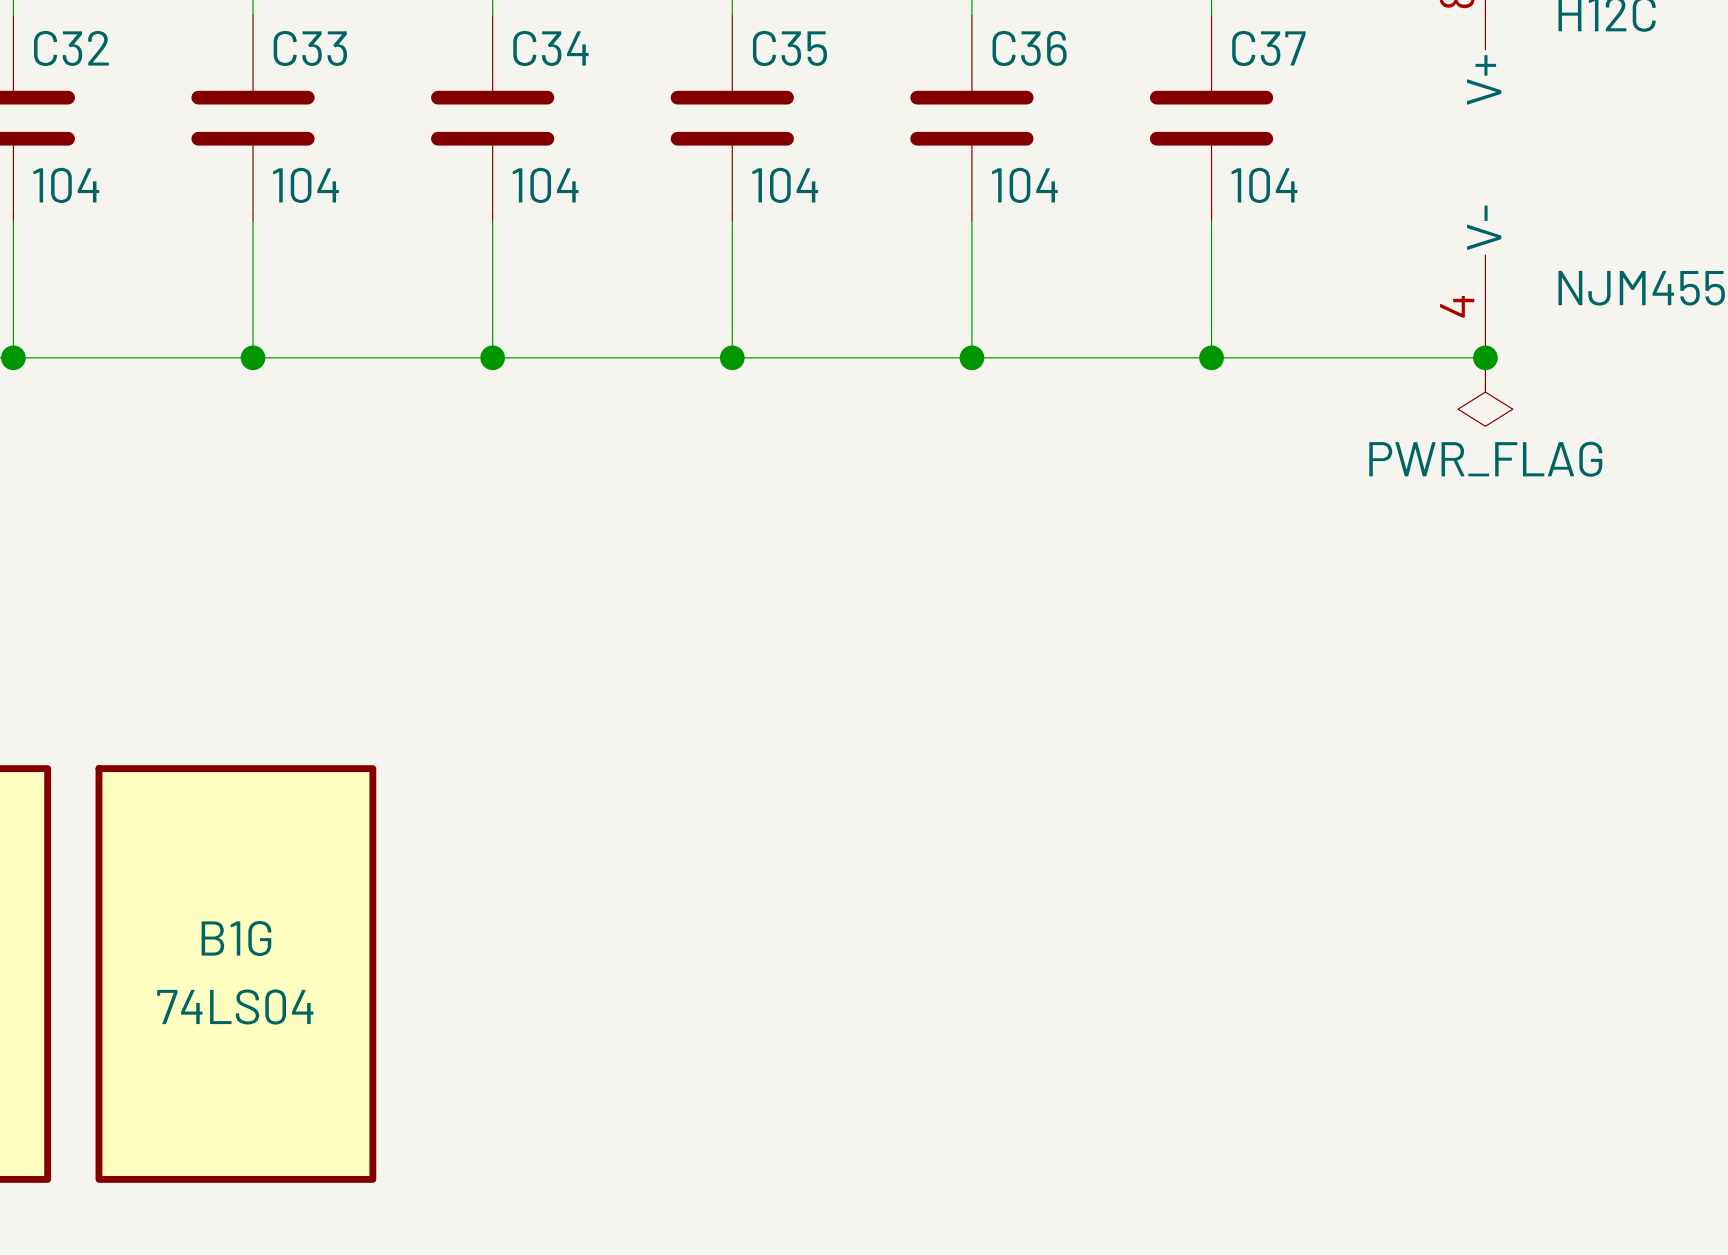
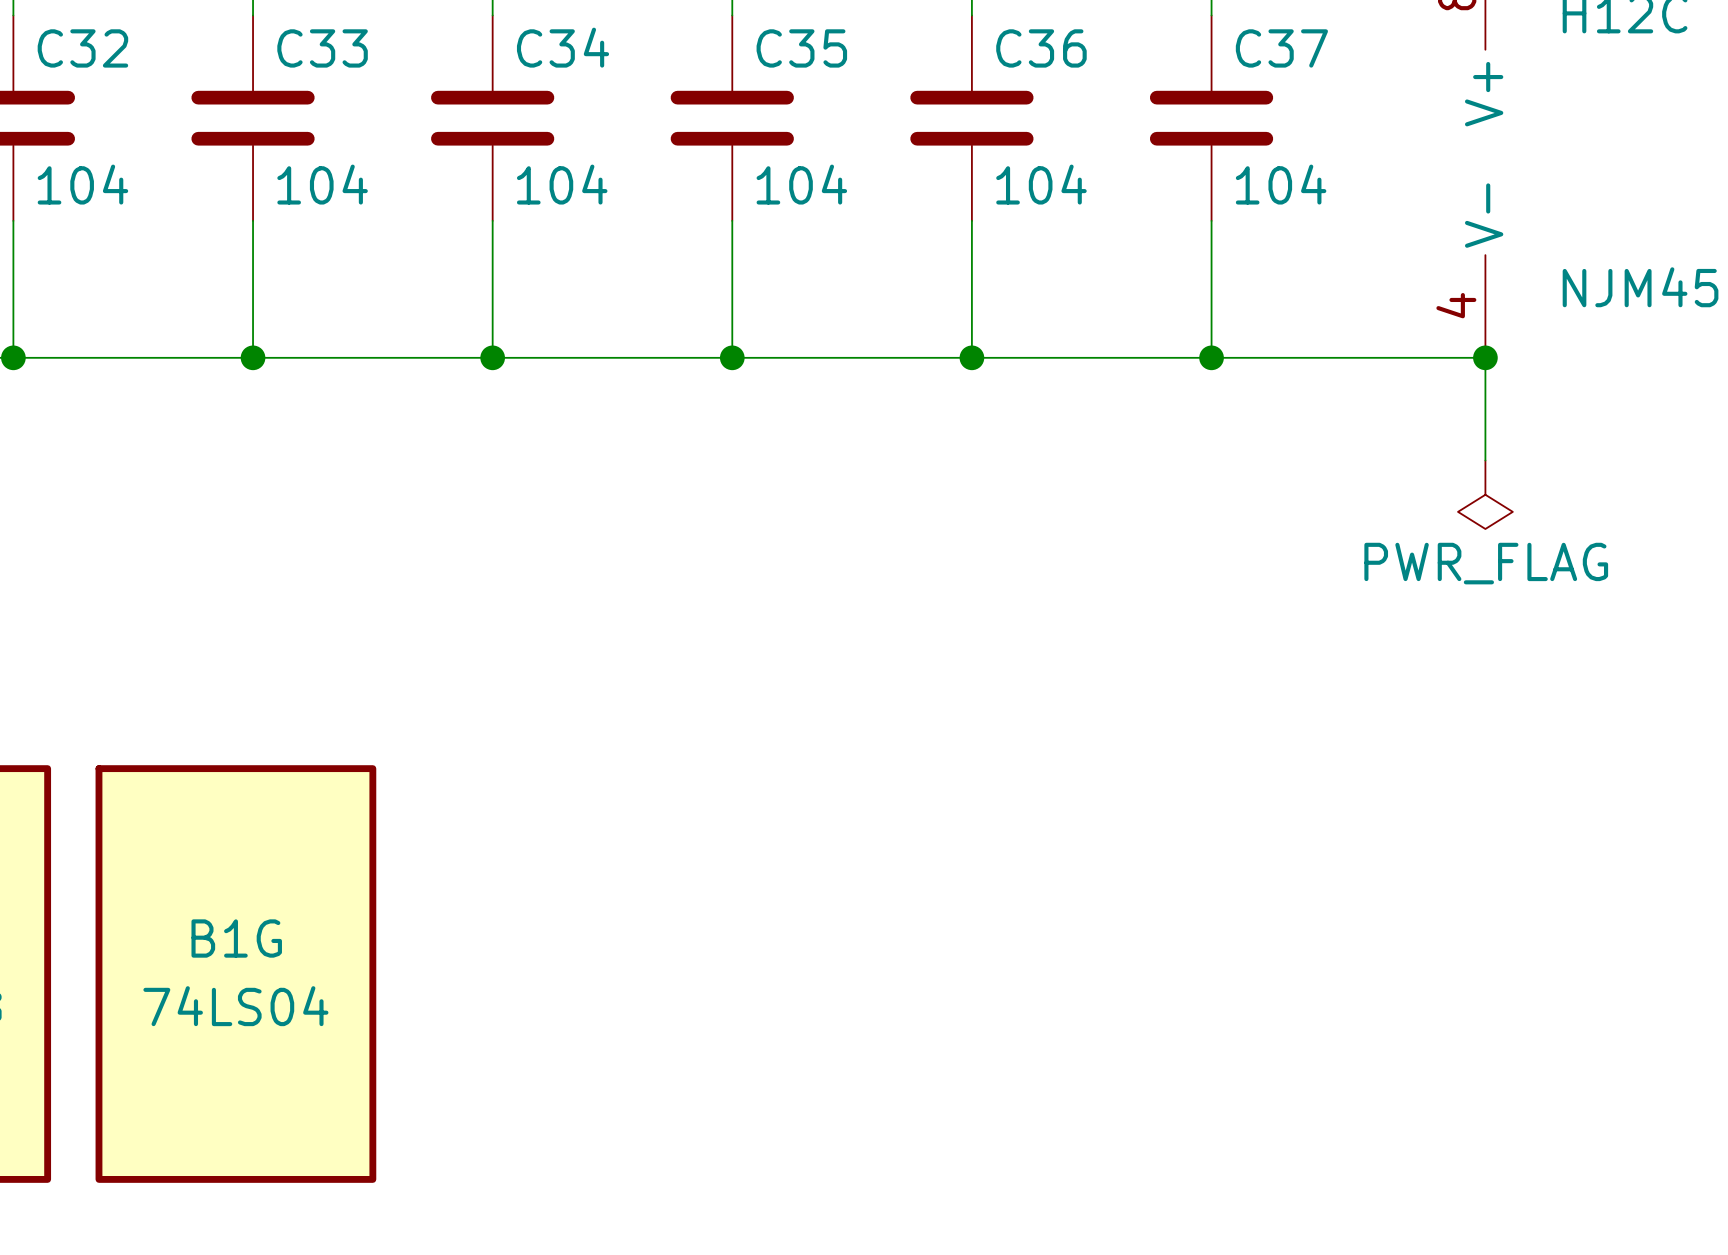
wire: none -> (1485, 357) (1485, 460)
power symbol position: PWR_FLAG (1485, 392) -> PWR_FLAG (1485, 494)

